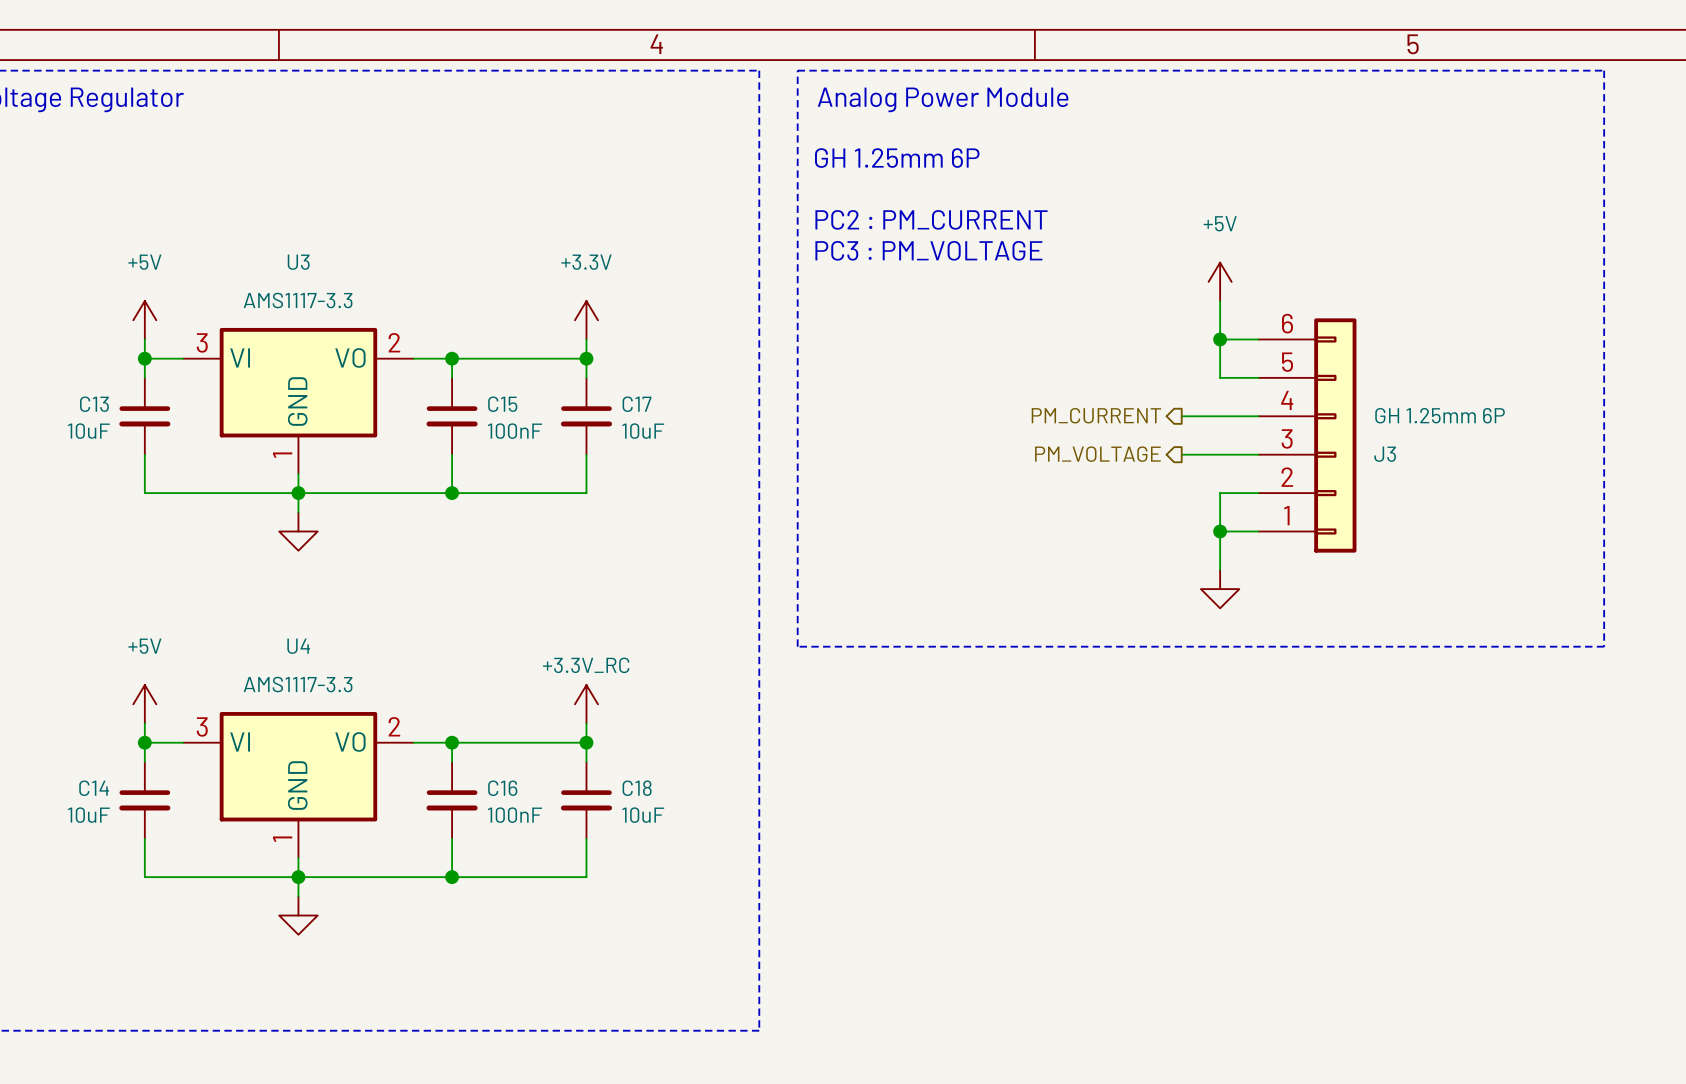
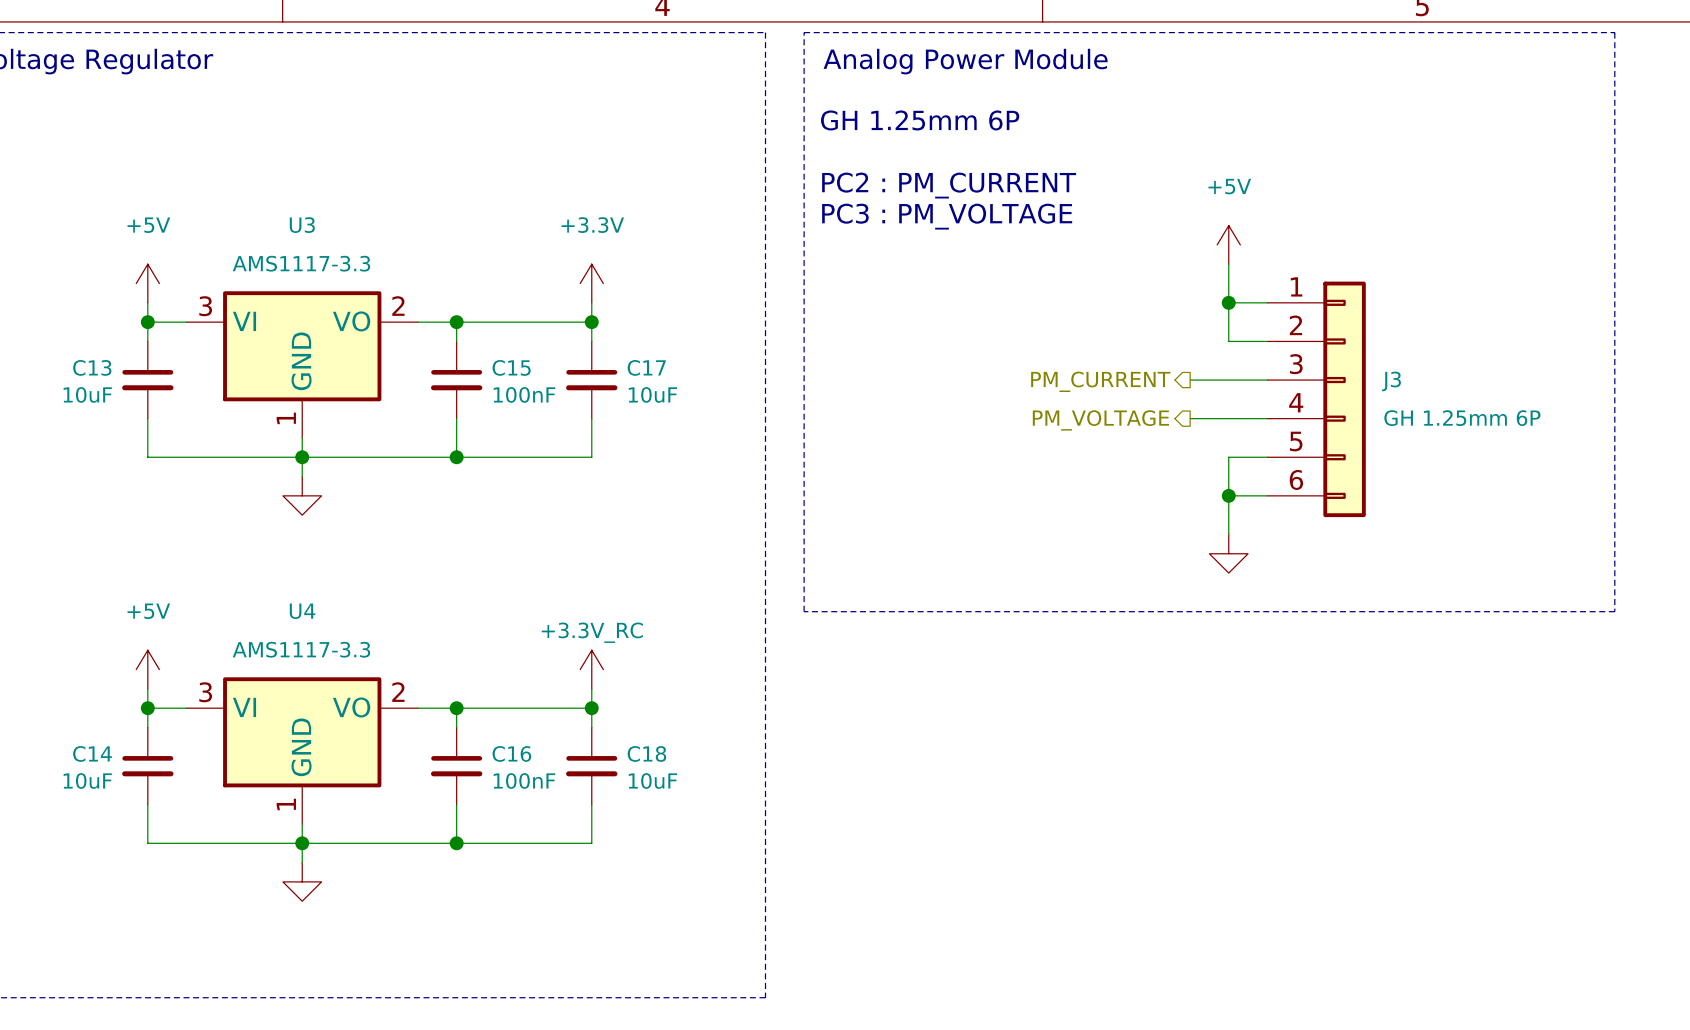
J3 flip: as is (1335, 435) -> up-down (1344, 399)

